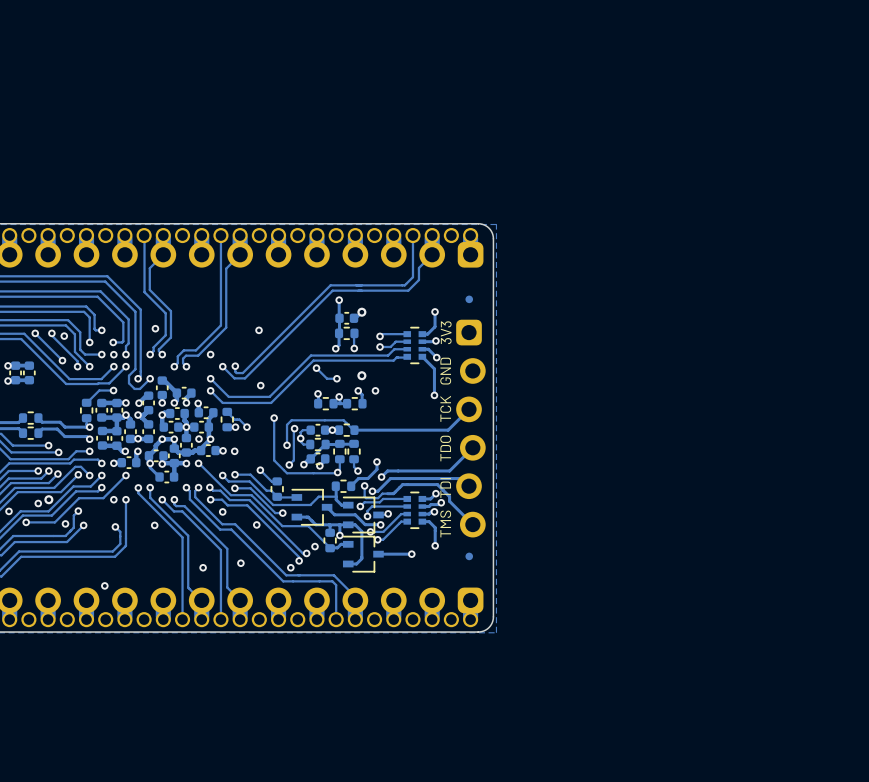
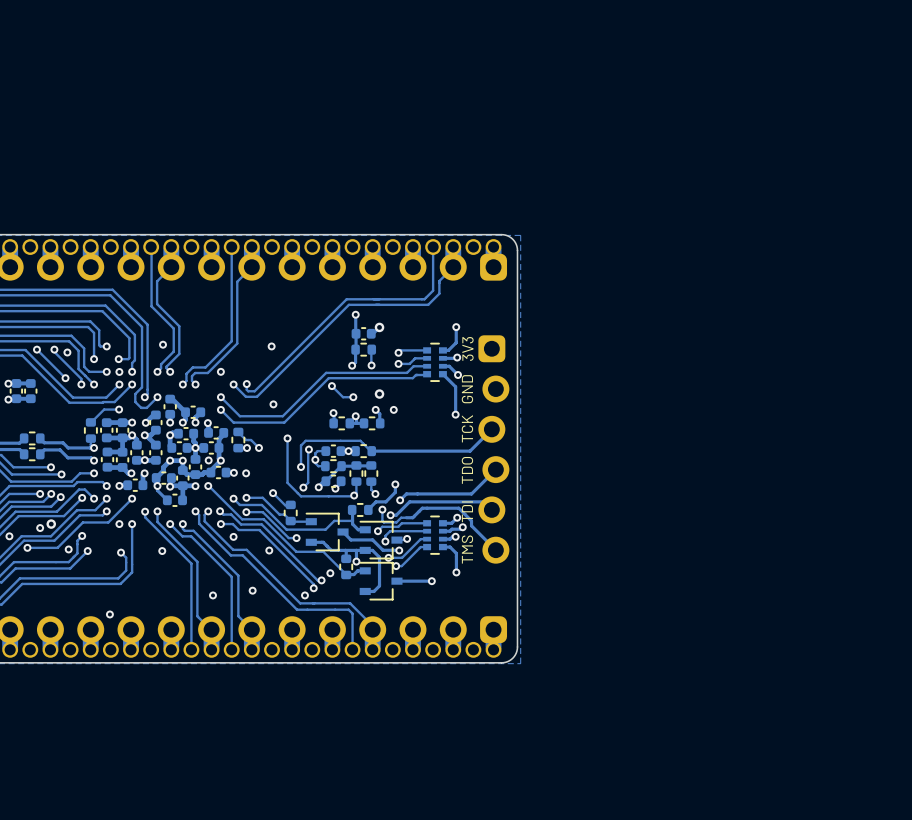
part: (469, 299) -> none
part: (469, 556) -> none

